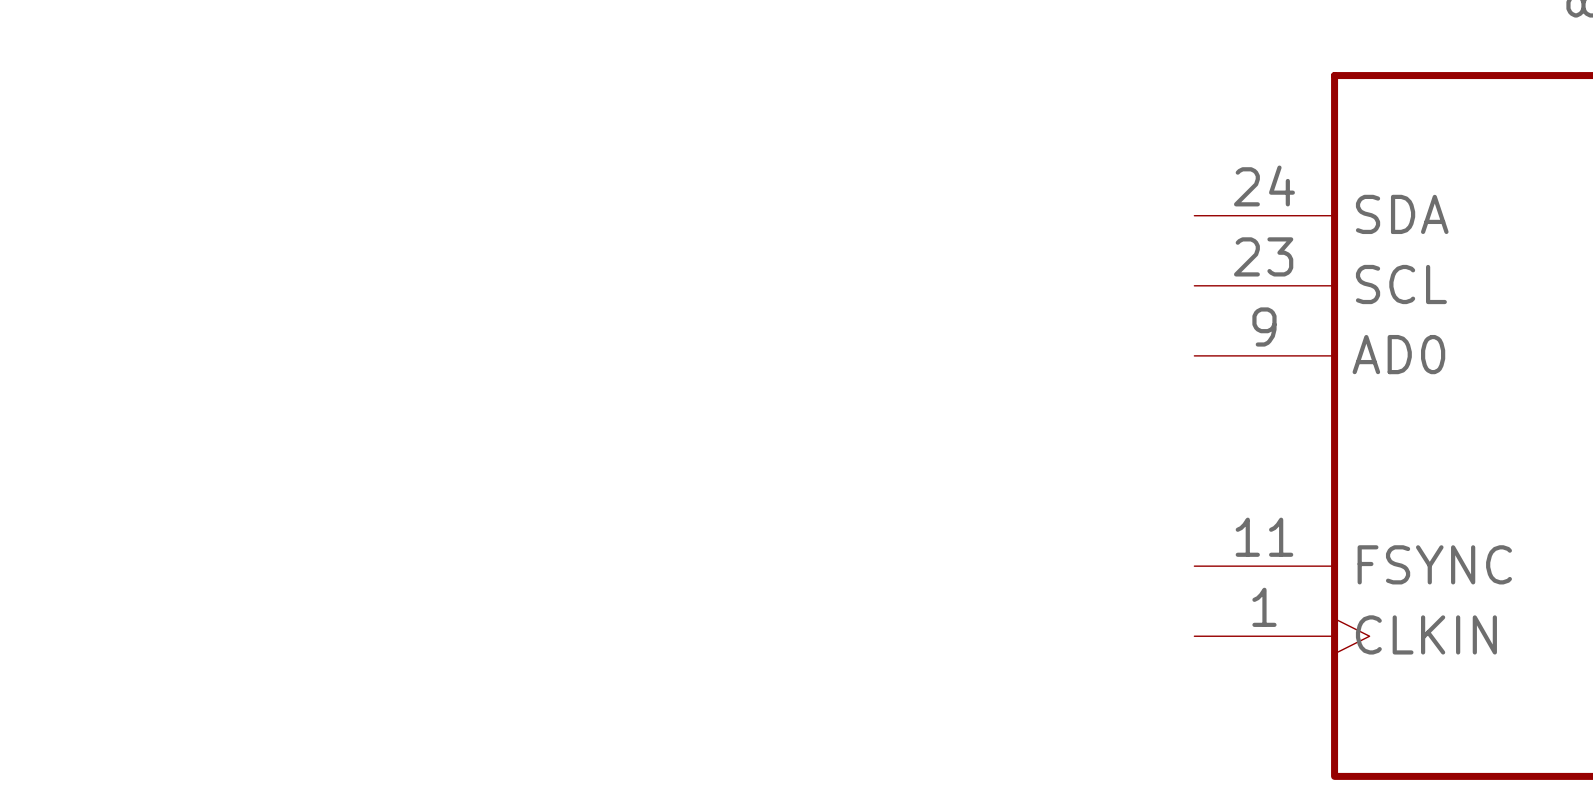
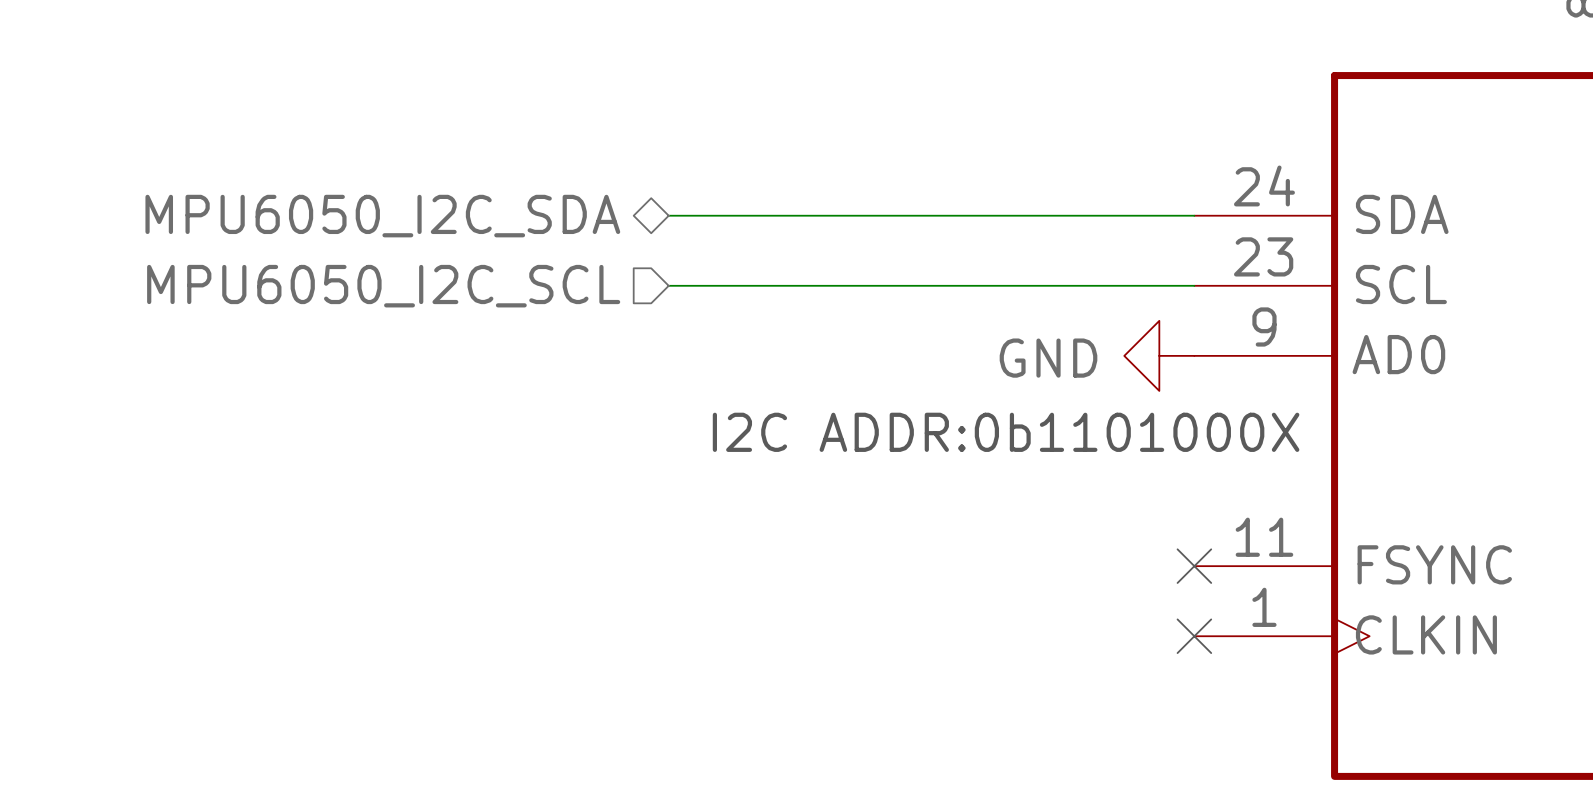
wire: none -> (668, 215) (1194, 215)
hierarchical label: none -> MPU6050_I2C_SDA (382, 216)
wire: none -> (668, 285) (1194, 285)
hierarchical label: none -> MPU6050_I2C_SCL (383, 286)
power symbol: none -> GND (1159, 355)
text: none -> I2C ADDR:0b1101000X (1006, 432)
no-connect mark: none -> (1194, 566)
no-connect mark: none -> (1194, 636)

